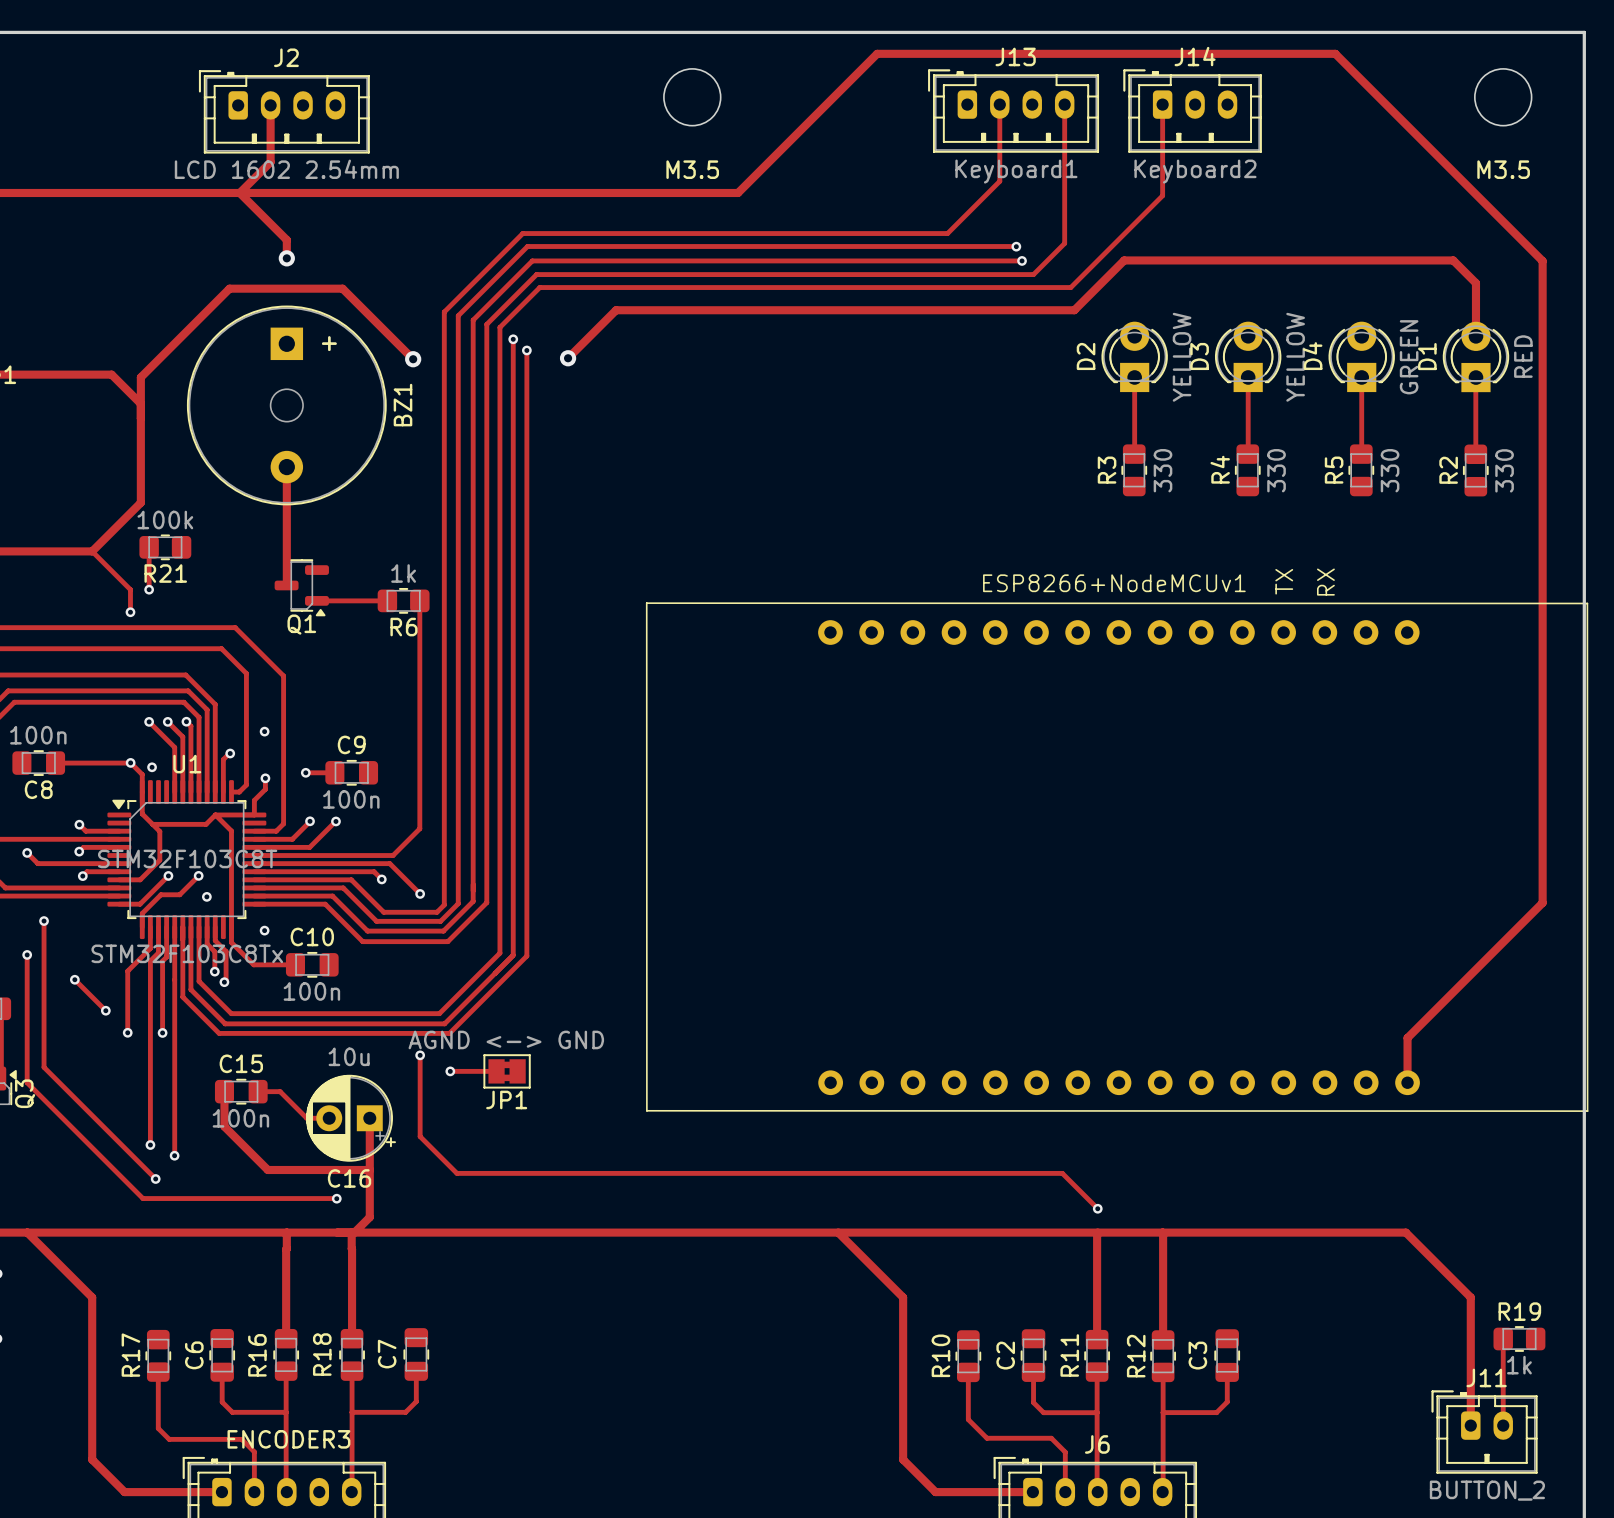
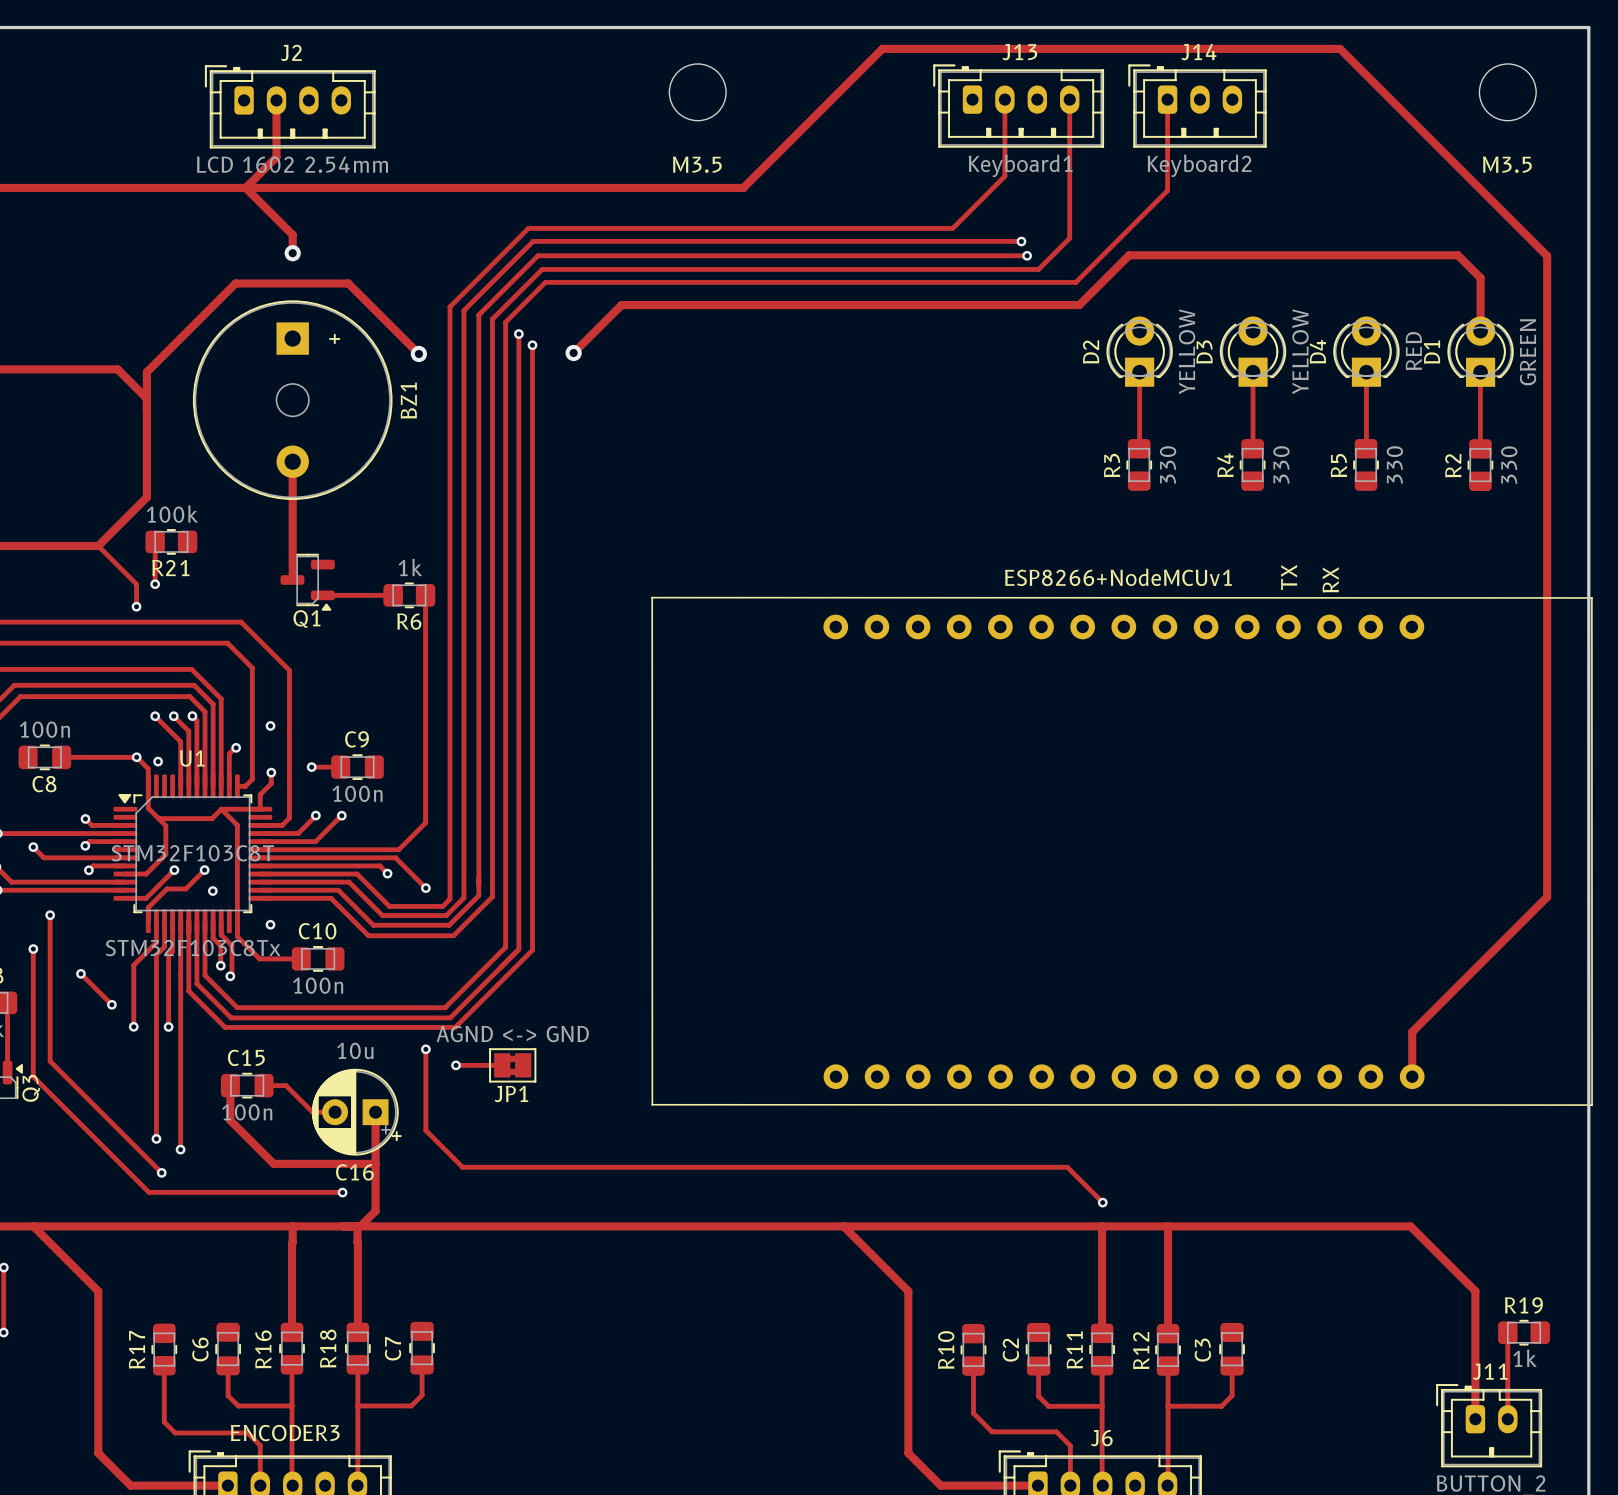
D1 value: RED (1523, 356) -> GREEN (1528, 352)
D4 value: GREEN (1409, 357) -> RED (1413, 351)

